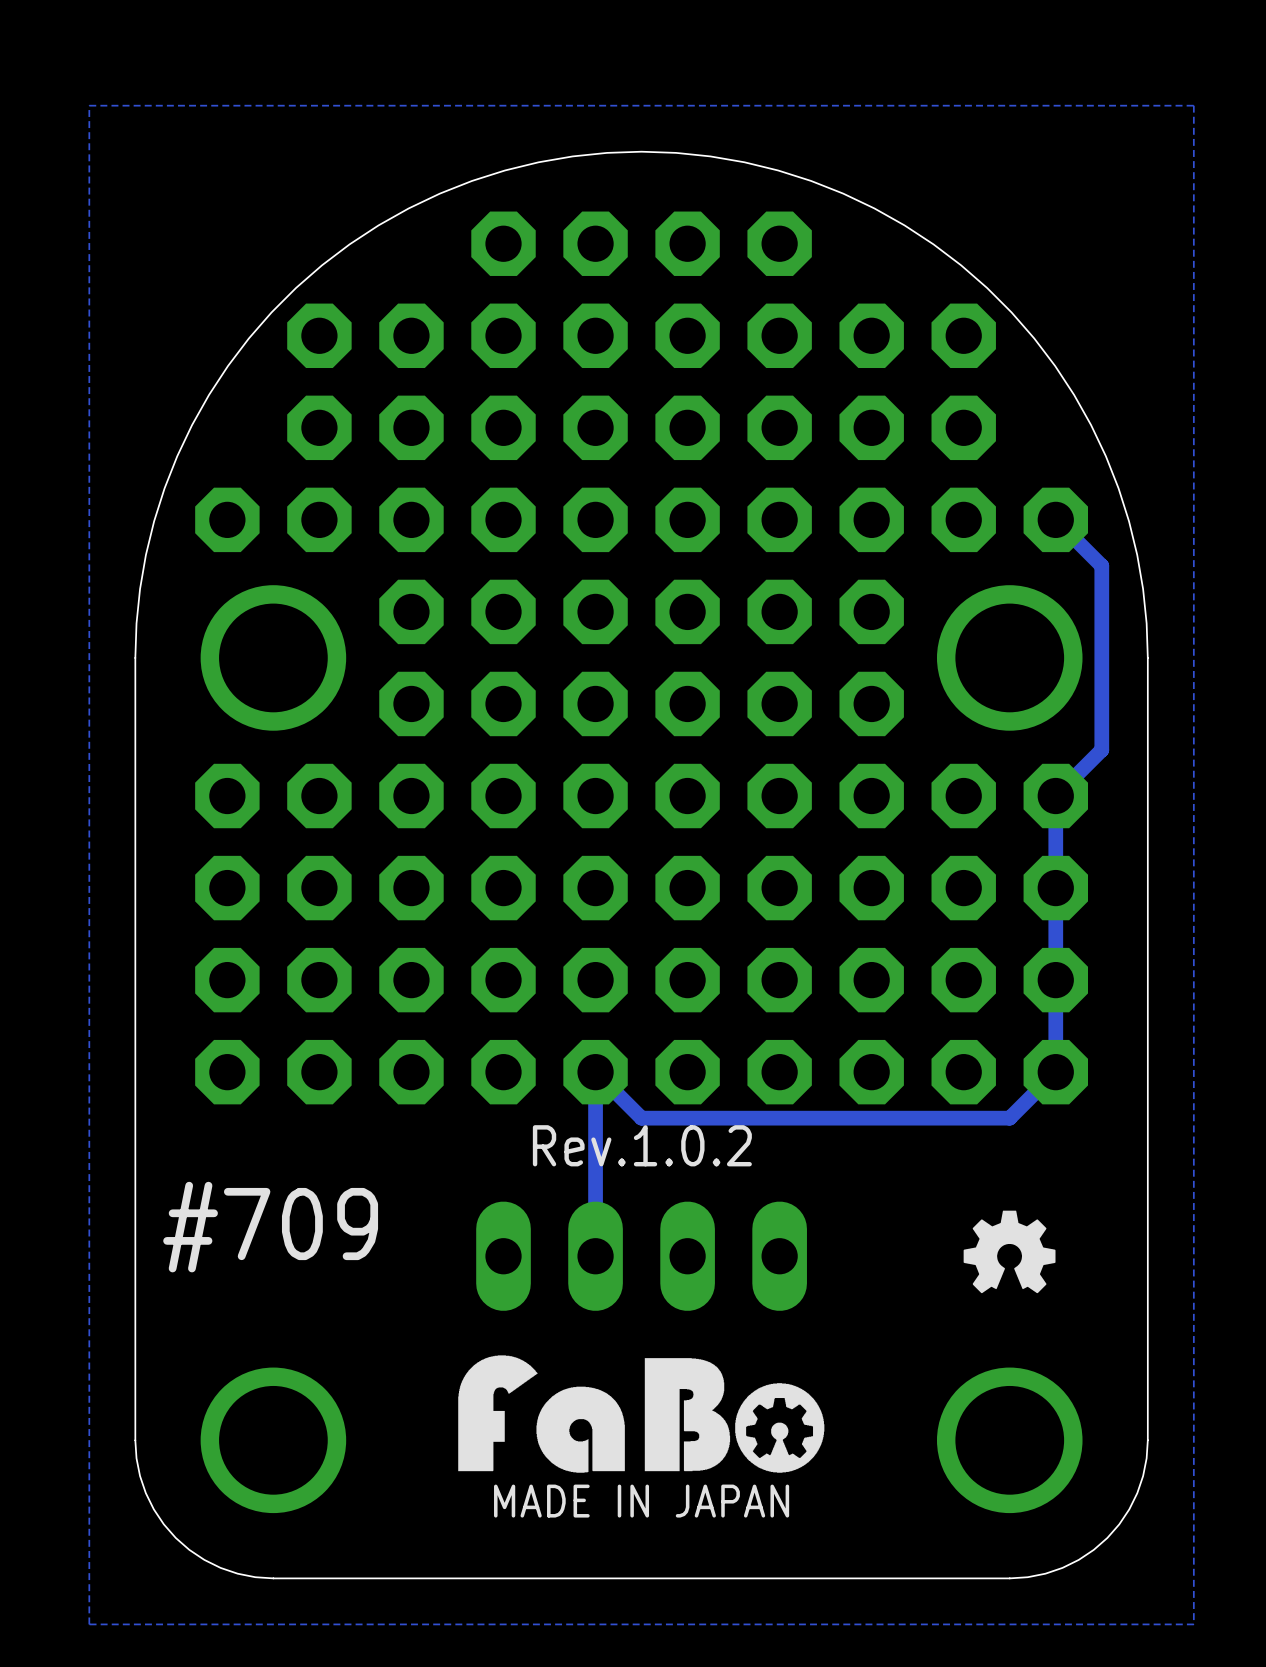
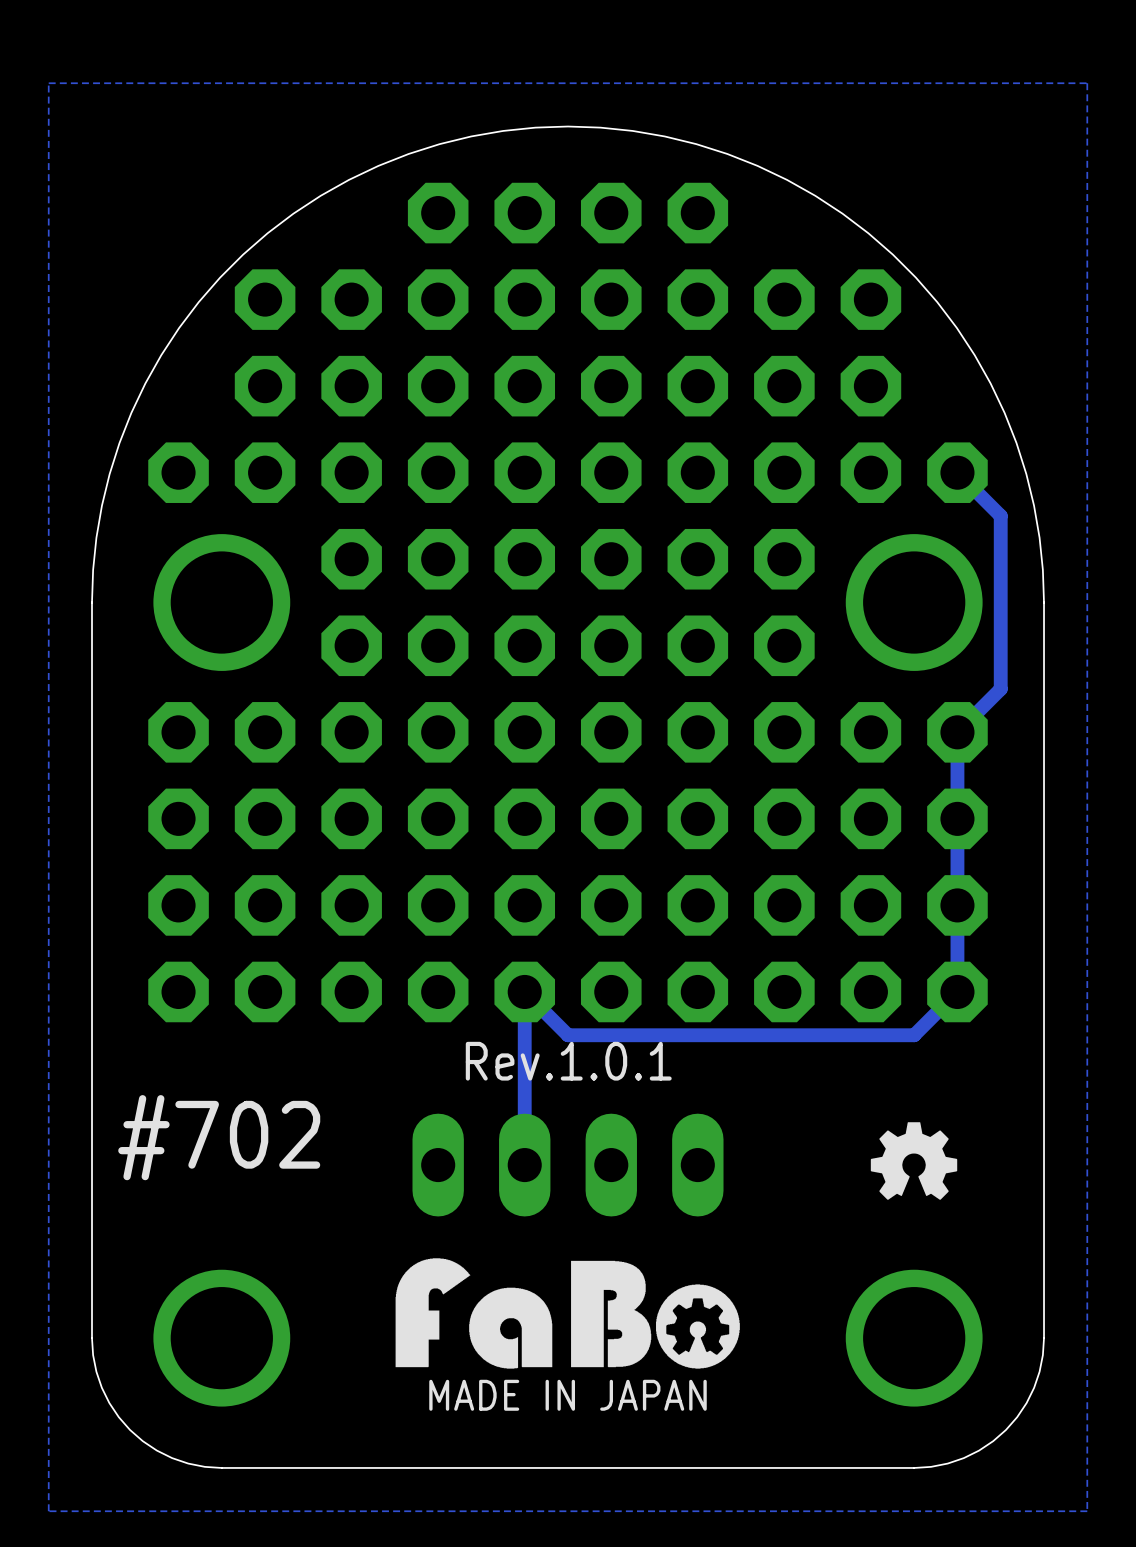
text: Rev.1.0.2 (642, 1145) -> Rev.1.0.1 (568, 1061)
text: #709 (270, 1227) -> #702 (219, 1137)

